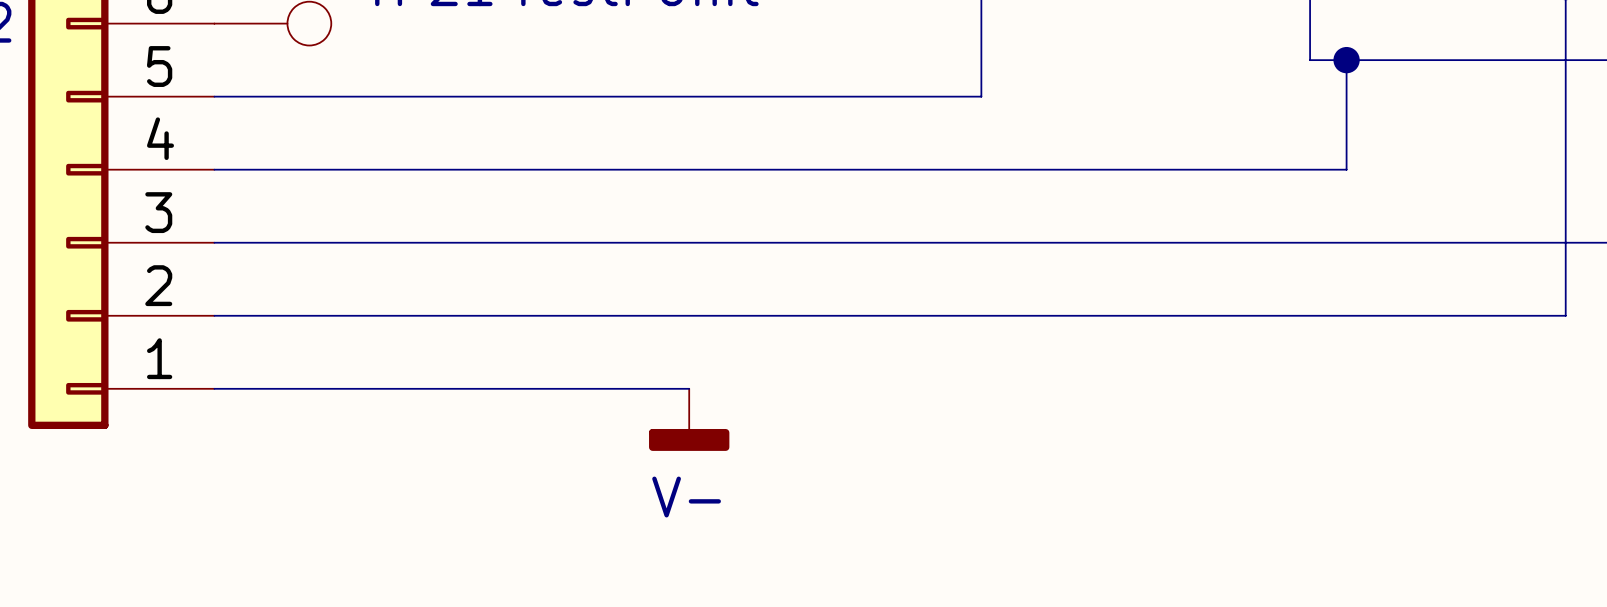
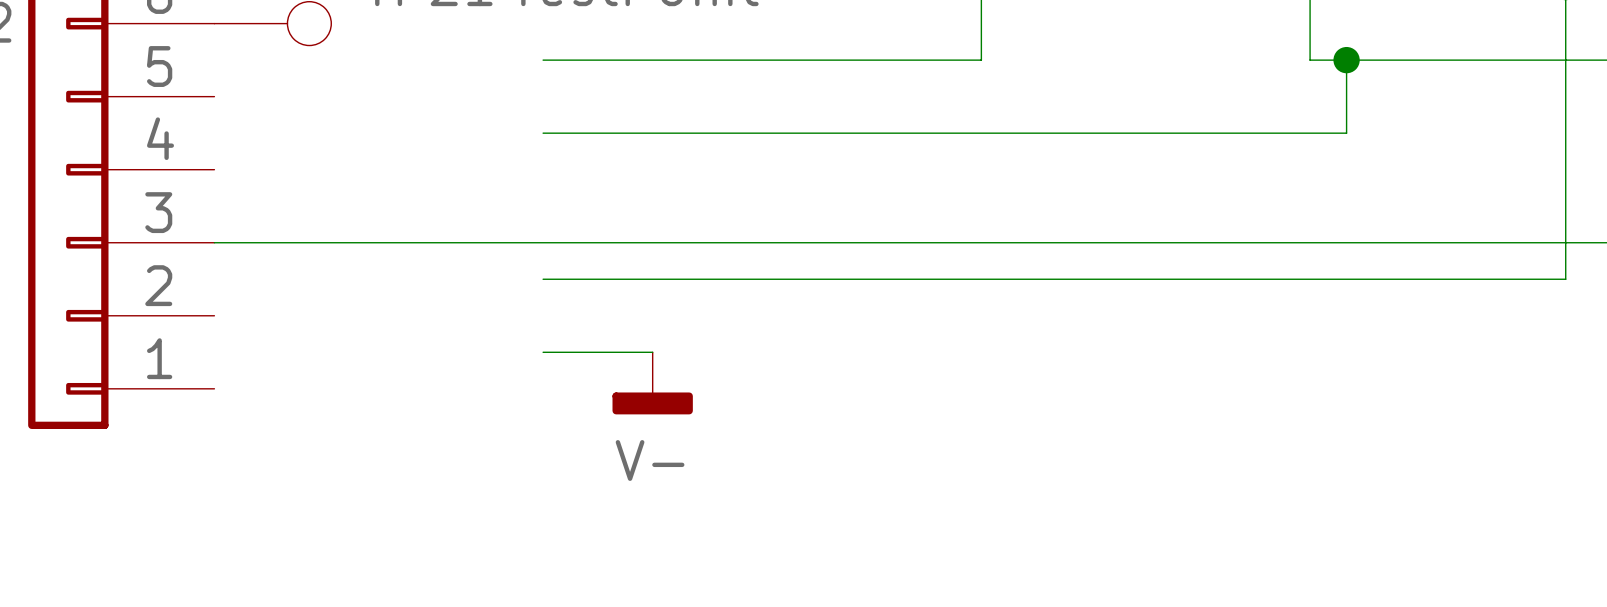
wire: (981, 60) (981, 96) (214, 96) -> (981, 60) (543, 60)
wire: (1346, 133) (1346, 169) (214, 169) -> (1346, 133) (543, 133)
wire: (1565, 279) (1565, 315) (214, 315) -> (1565, 279) (543, 279)
wire: none -> (543, 352) (652, 352)
wire: (214, 388) (689, 388) -> none
power symbol position: V- (689, 419) -> V- (652, 383)

